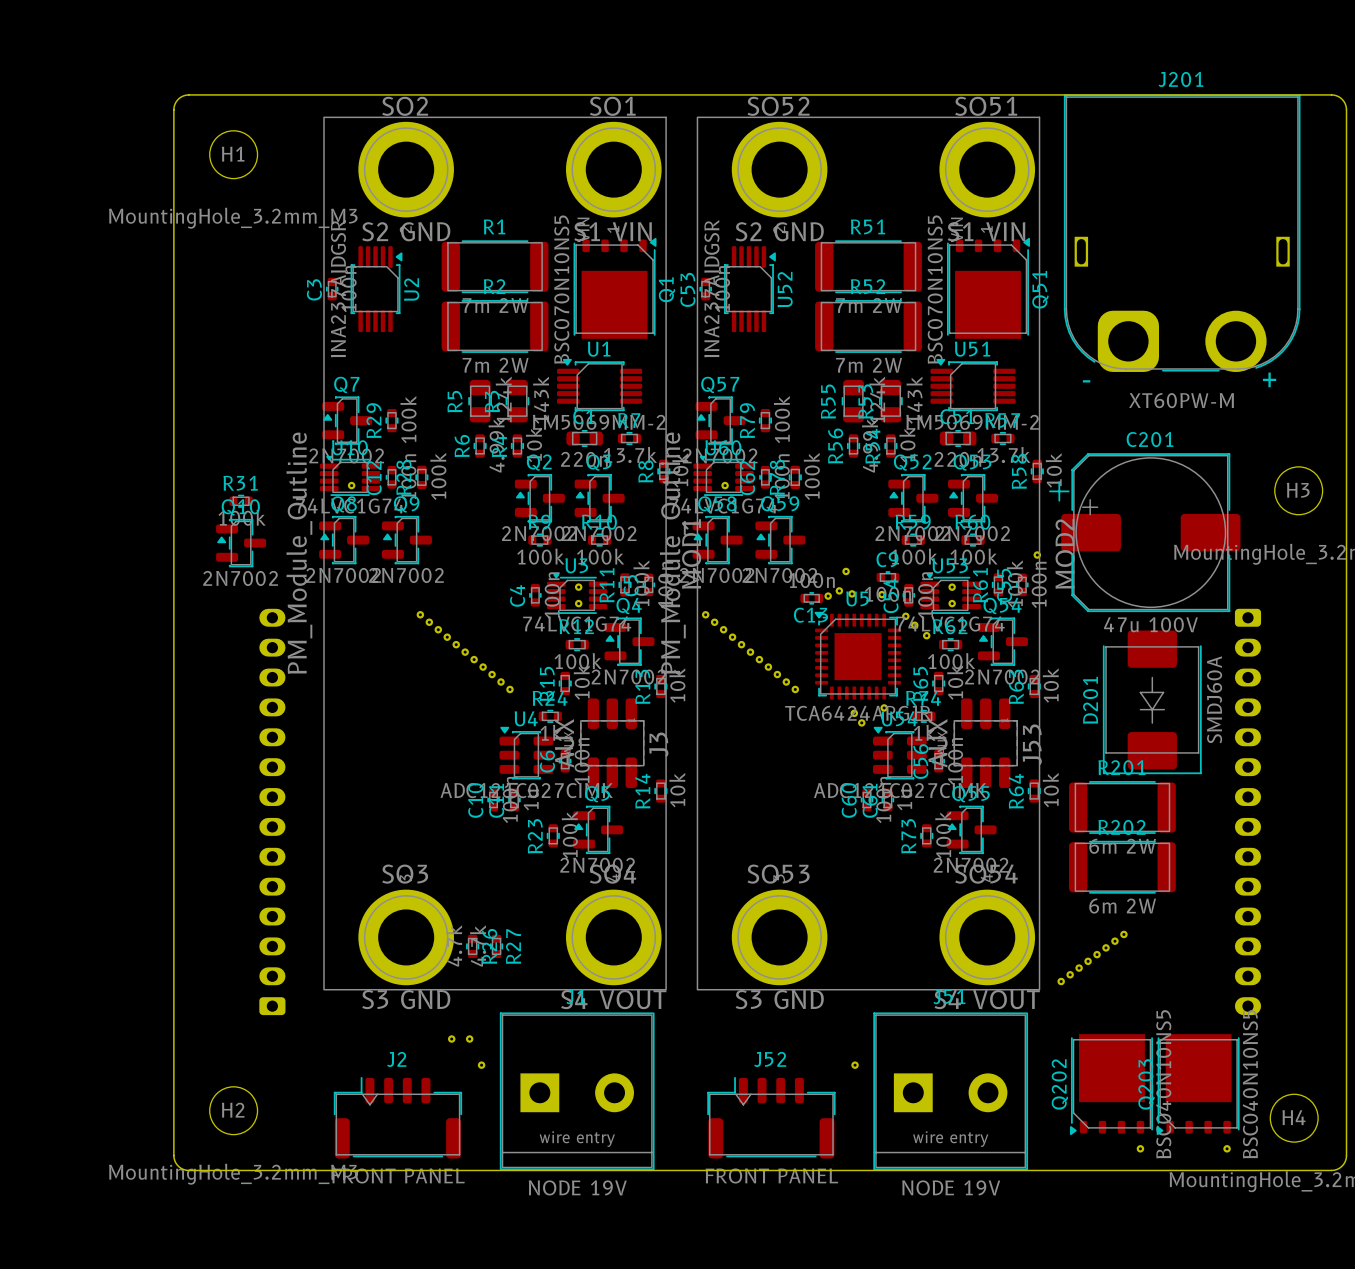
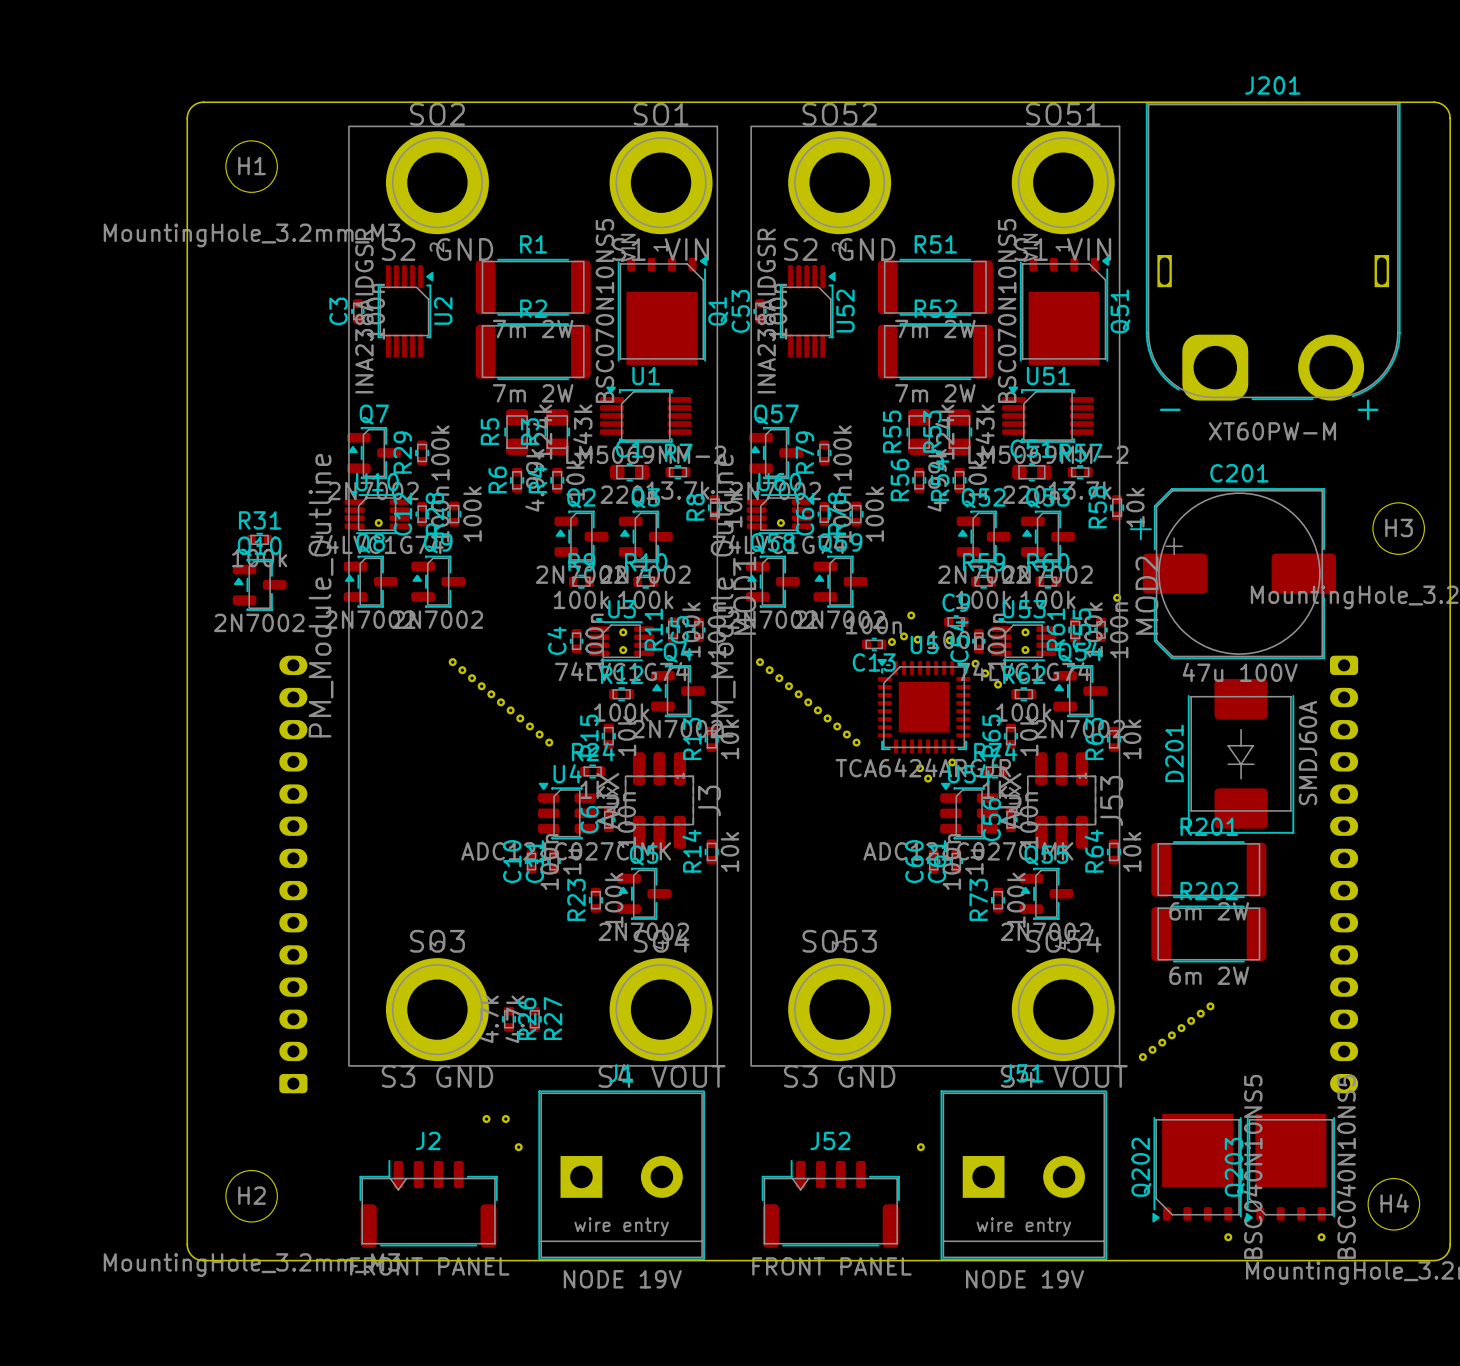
U2 value: INA237AIDGSR (338, 288) -> INA238AIDGSR (364, 311)
U52 value: INA237AIDGSR (711, 288) -> INA238AIDGSR (766, 311)

